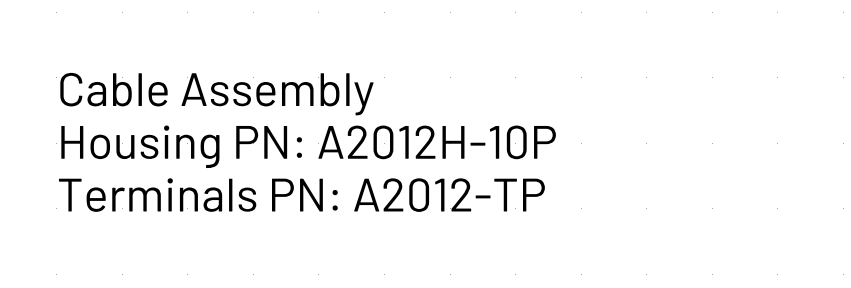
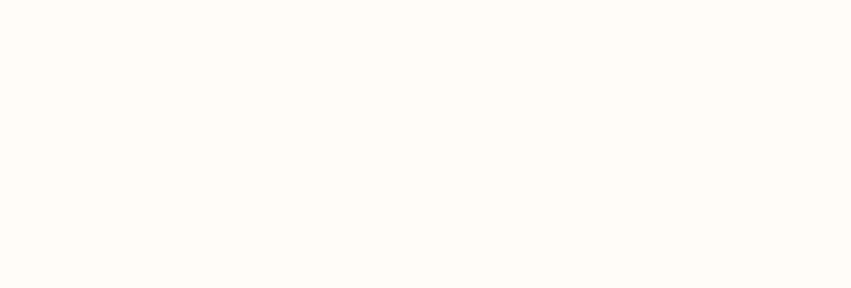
text: Cable Assembly (217, 94) -> none
text: Housing PN: A2012H-10P (308, 146) -> none
text: Terminals PN: A2012-TP (301, 195) -> none

